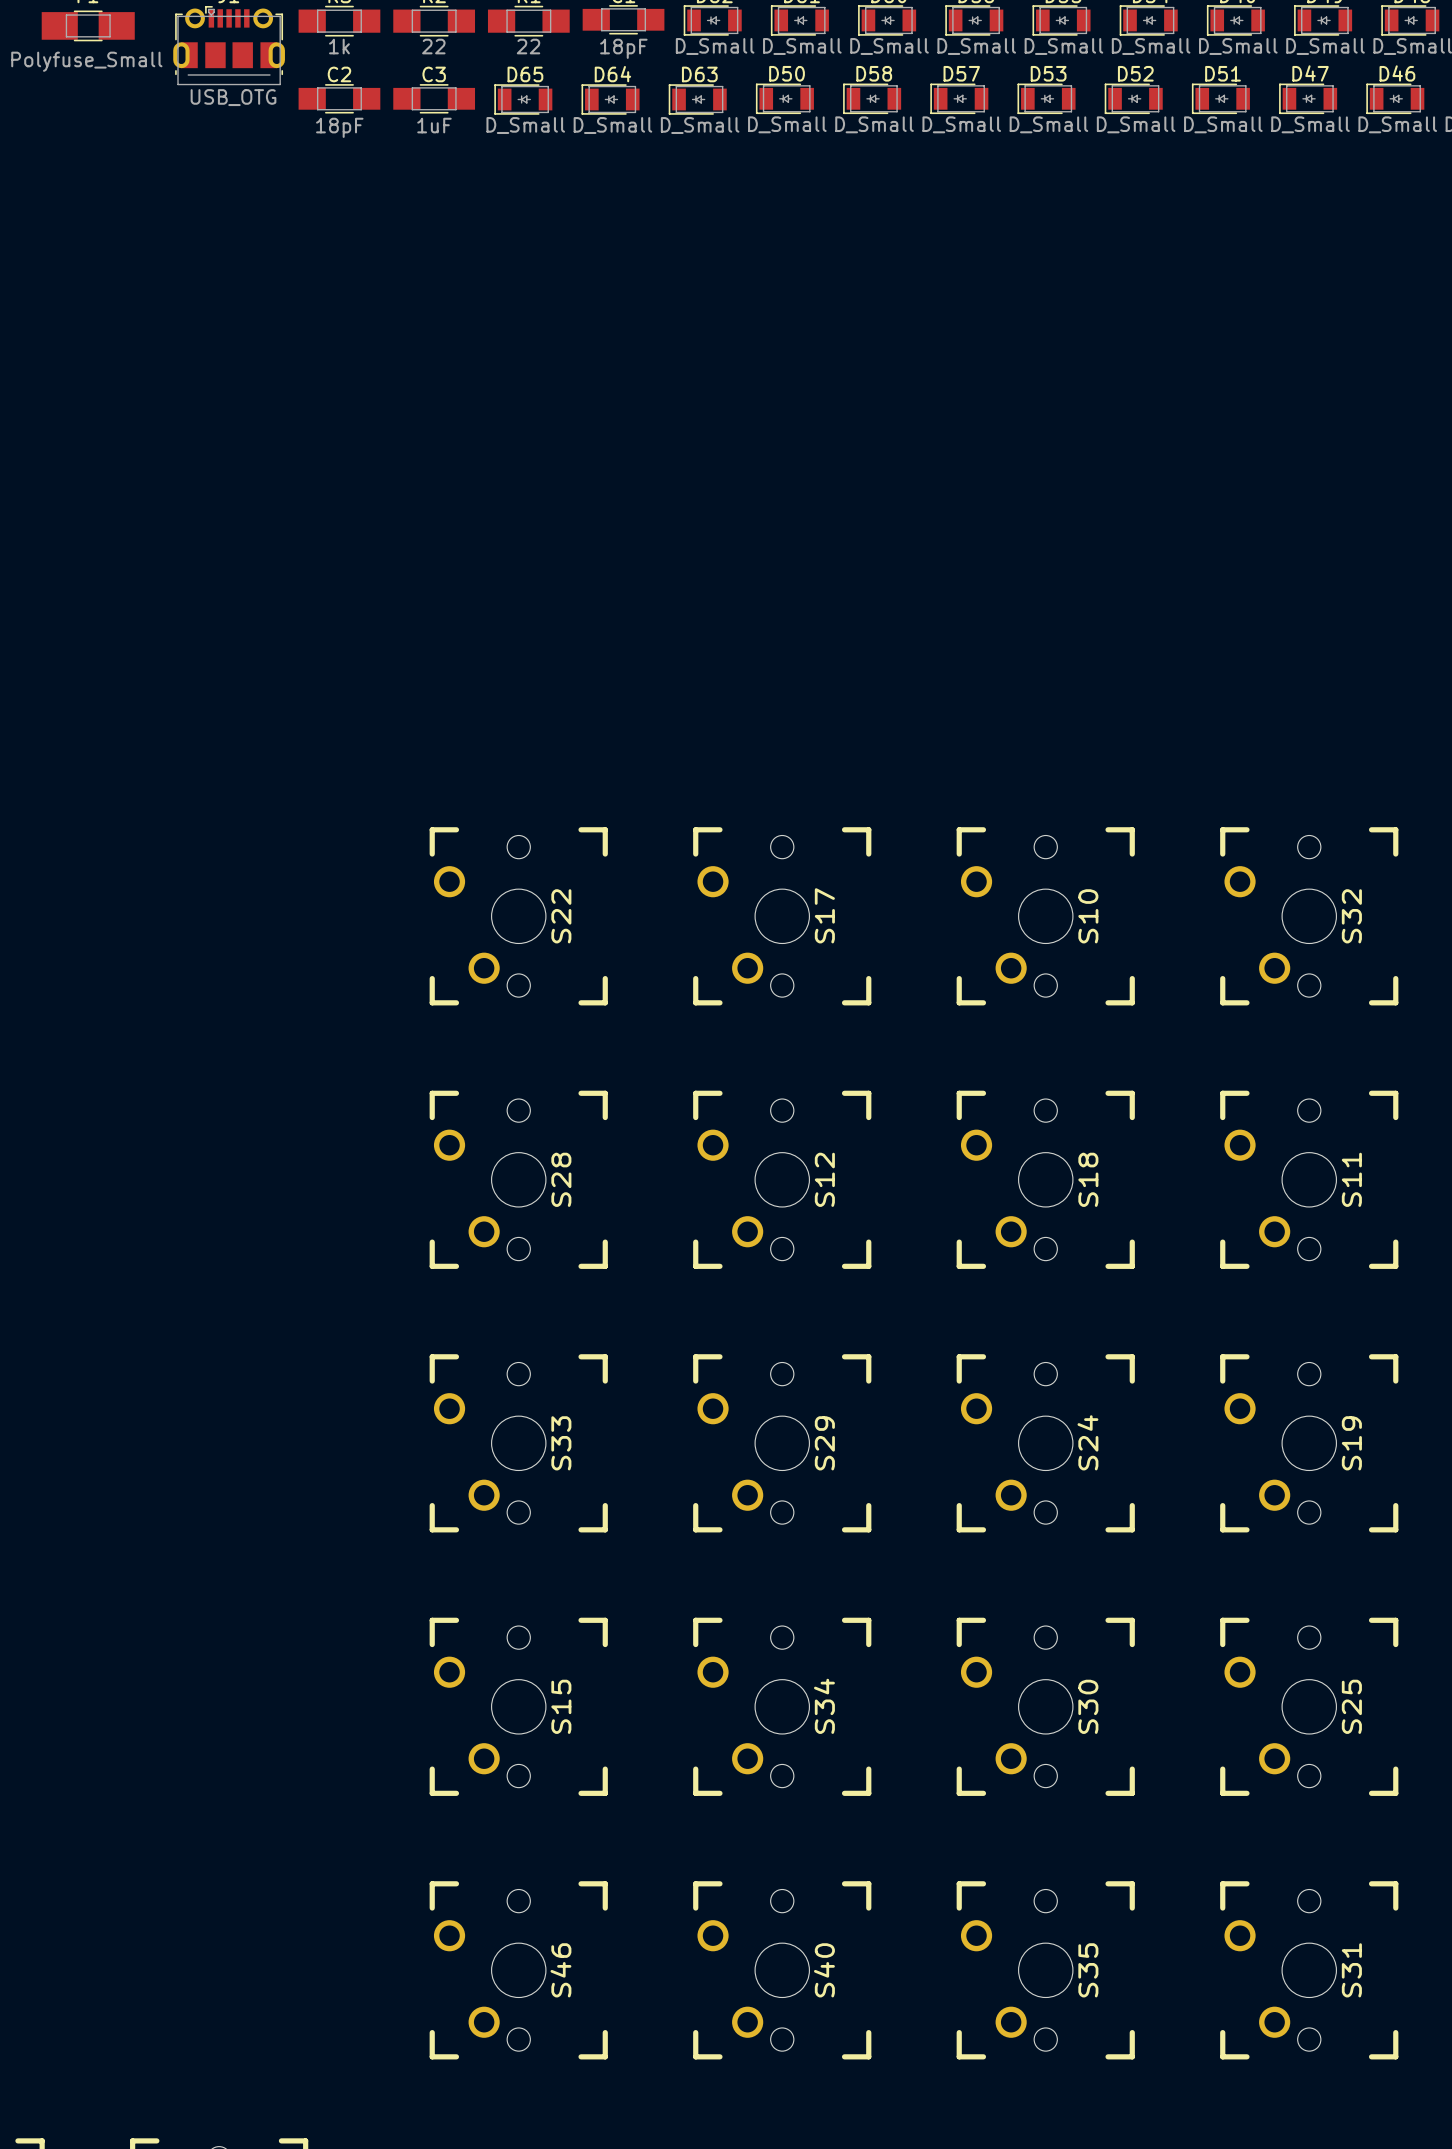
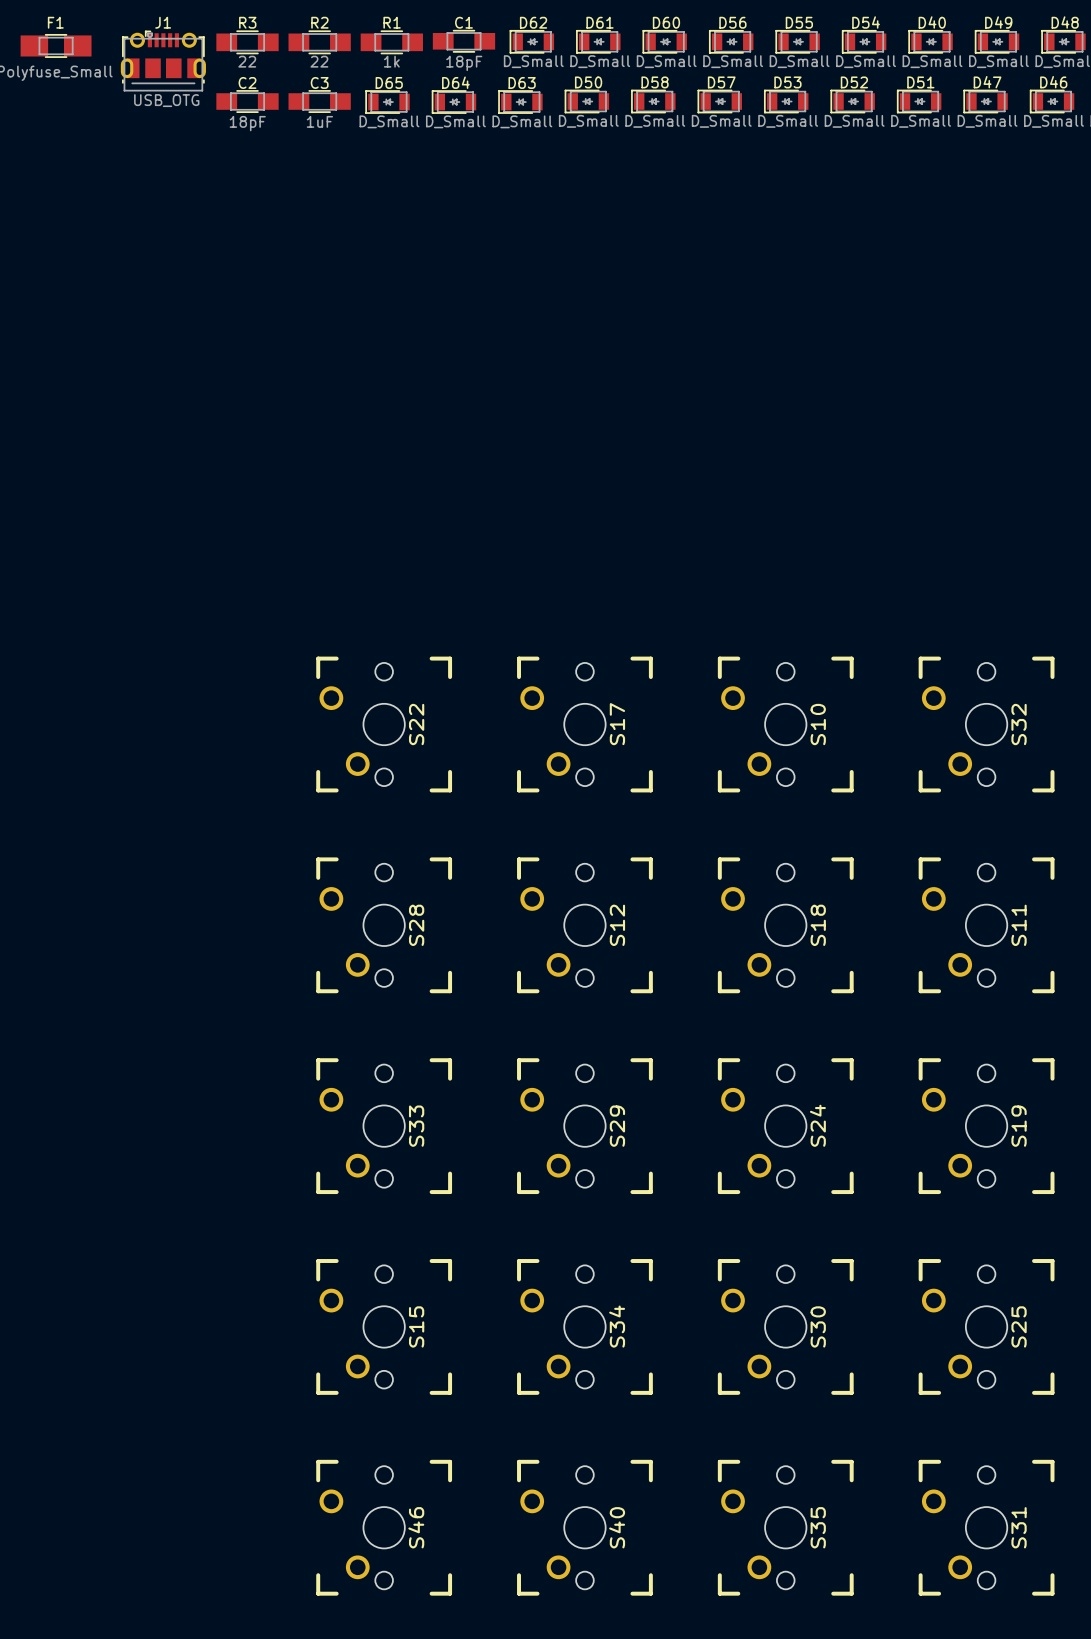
R3 value: 1k (339, 46) -> 22 (247, 61)
R1 value: 22 (528, 46) -> 1k (391, 61)

